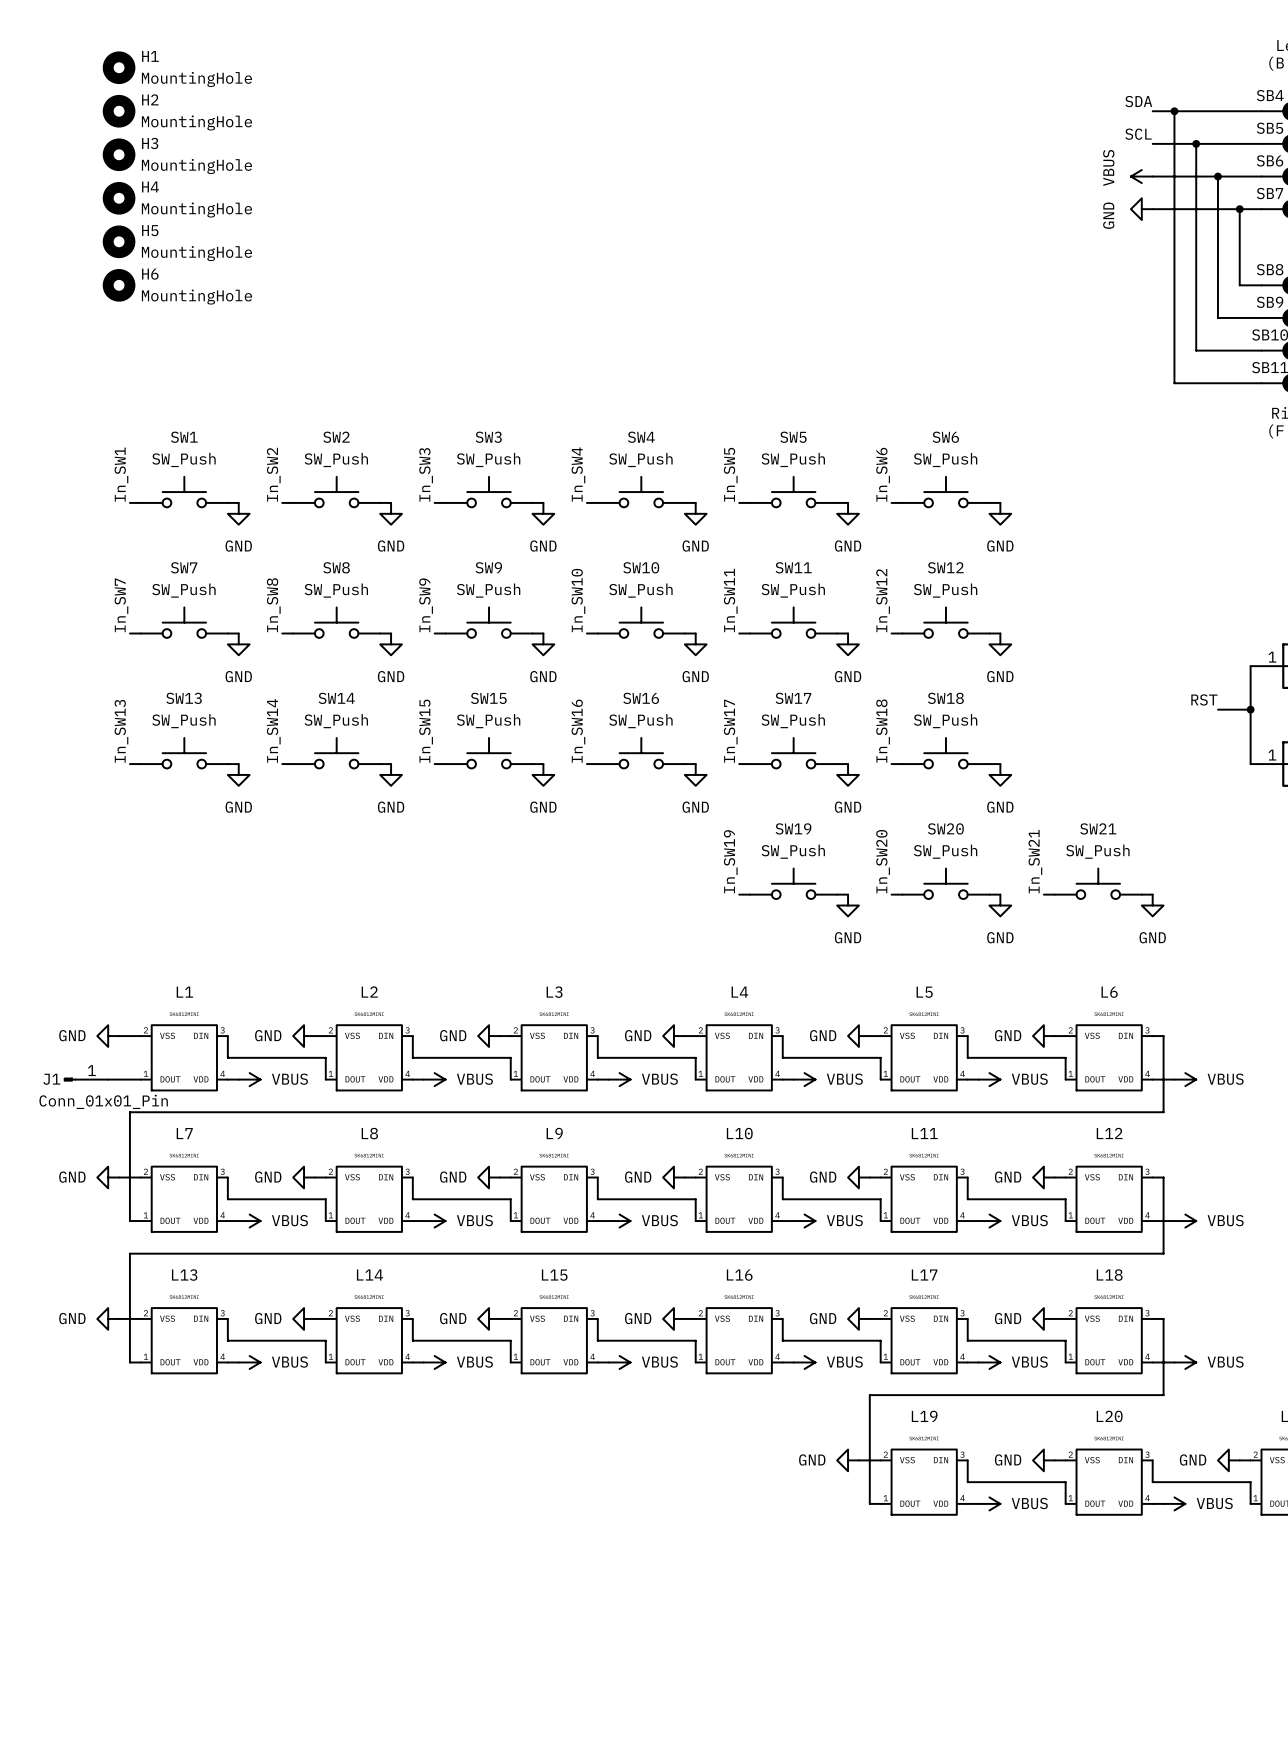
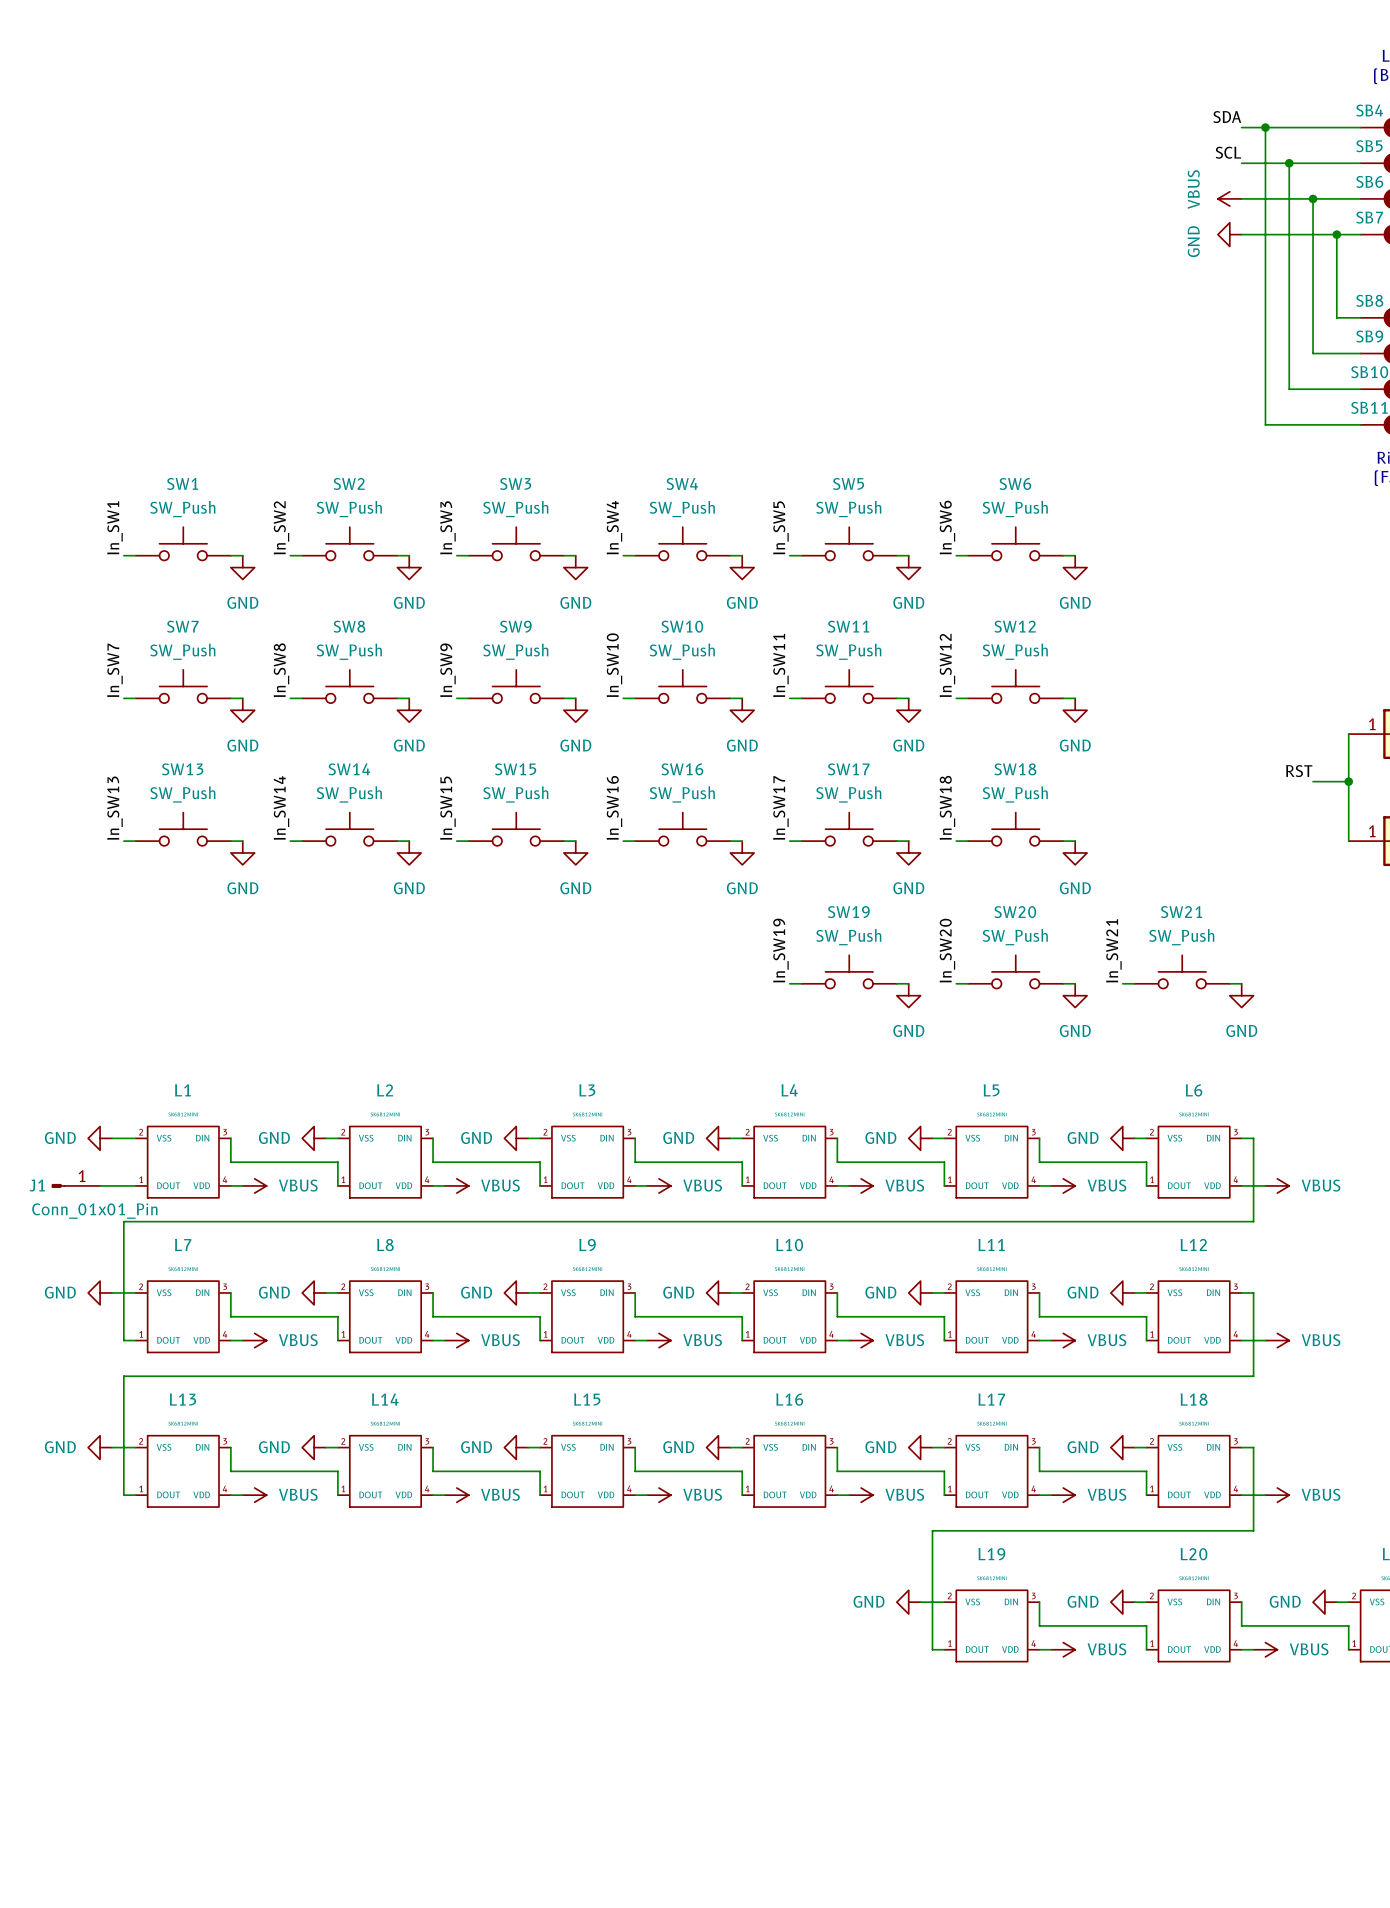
H1: MountingHole (119, 67) -> none
H2: MountingHole (119, 111) -> none
H3: MountingHole (119, 154) -> none
H4: MountingHole (119, 198) -> none
H5: MountingHole (119, 241) -> none
H6: MountingHole (119, 285) -> none

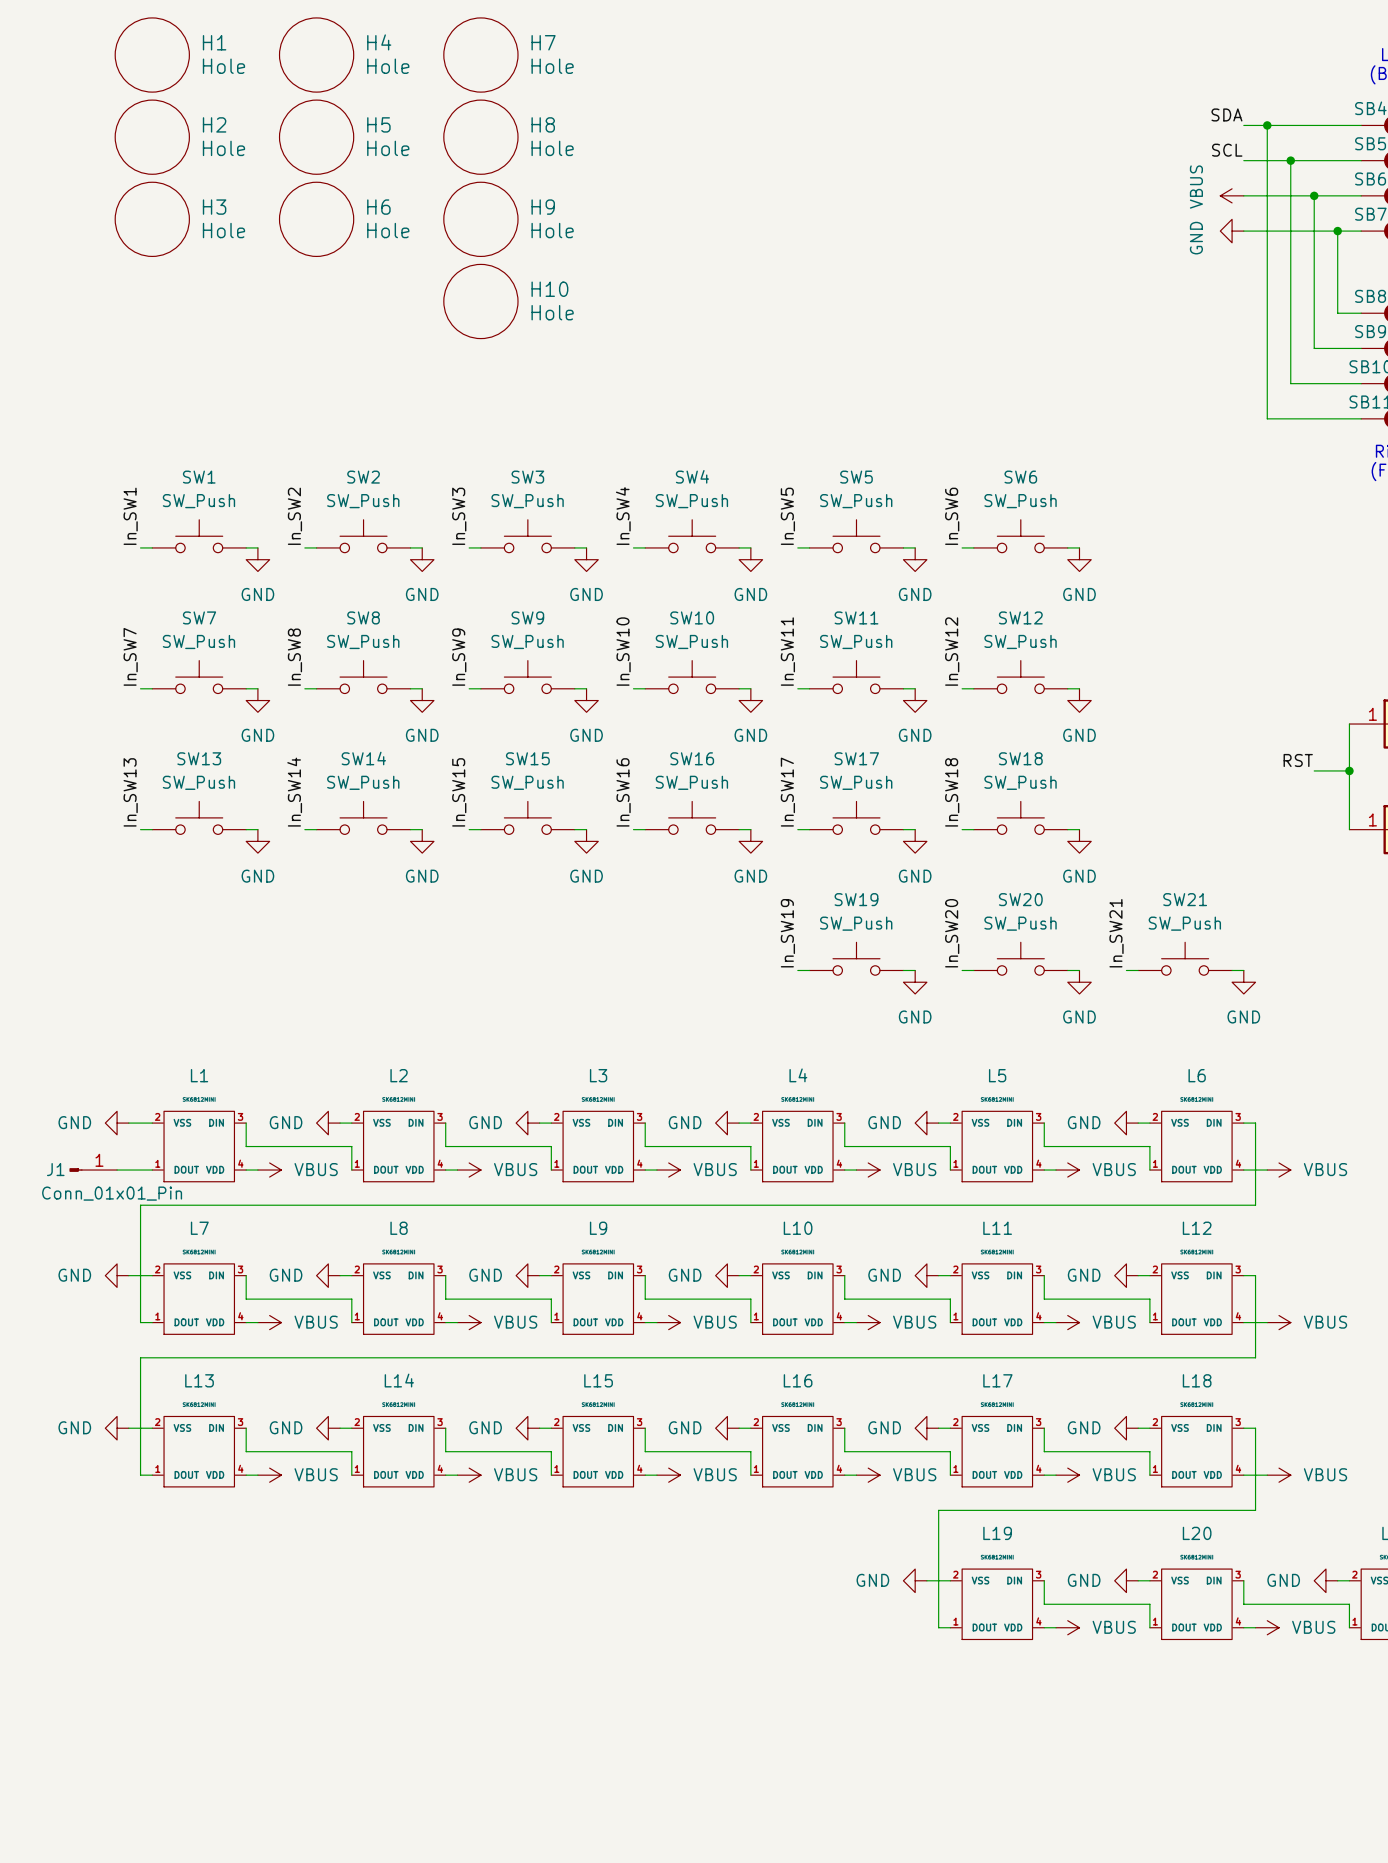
H1: none -> Hole (152, 55)
H4: none -> Hole (316, 55)
H7: none -> Hole (480, 55)
H2: none -> Hole (152, 137)
H5: none -> Hole (316, 137)
H8: none -> Hole (480, 137)
H3: none -> Hole (152, 219)
H6: none -> Hole (316, 219)
H9: none -> Hole (480, 219)
H10: none -> Hole (480, 301)

